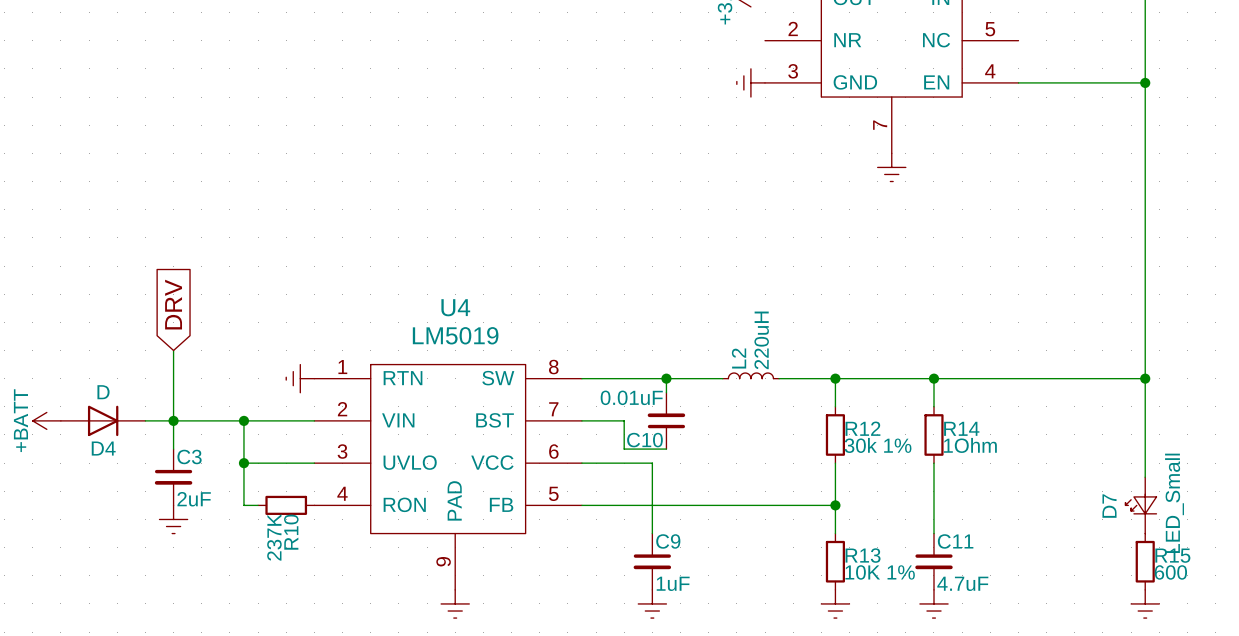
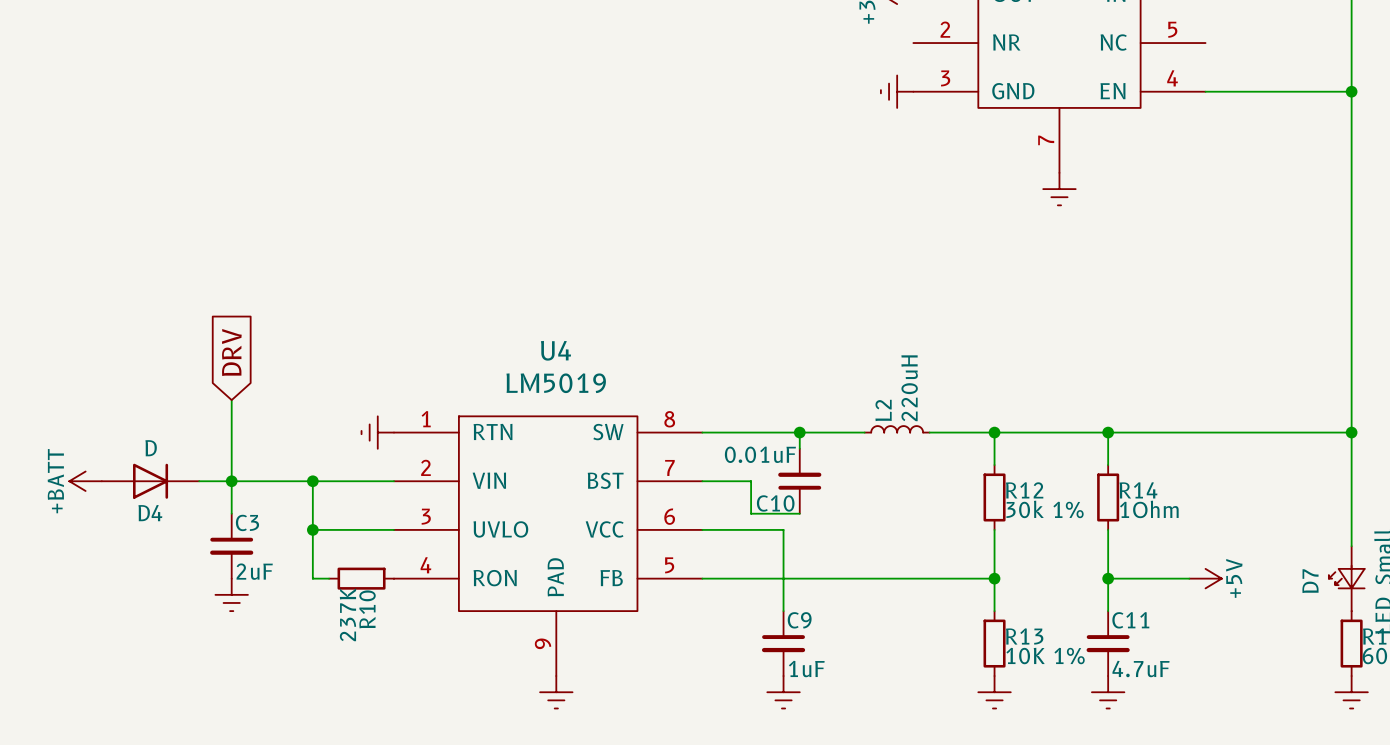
wire: none -> (1108, 578) (1189, 578)
junction: none -> (1108, 578)
power symbol: none -> +5V (1205, 578)

